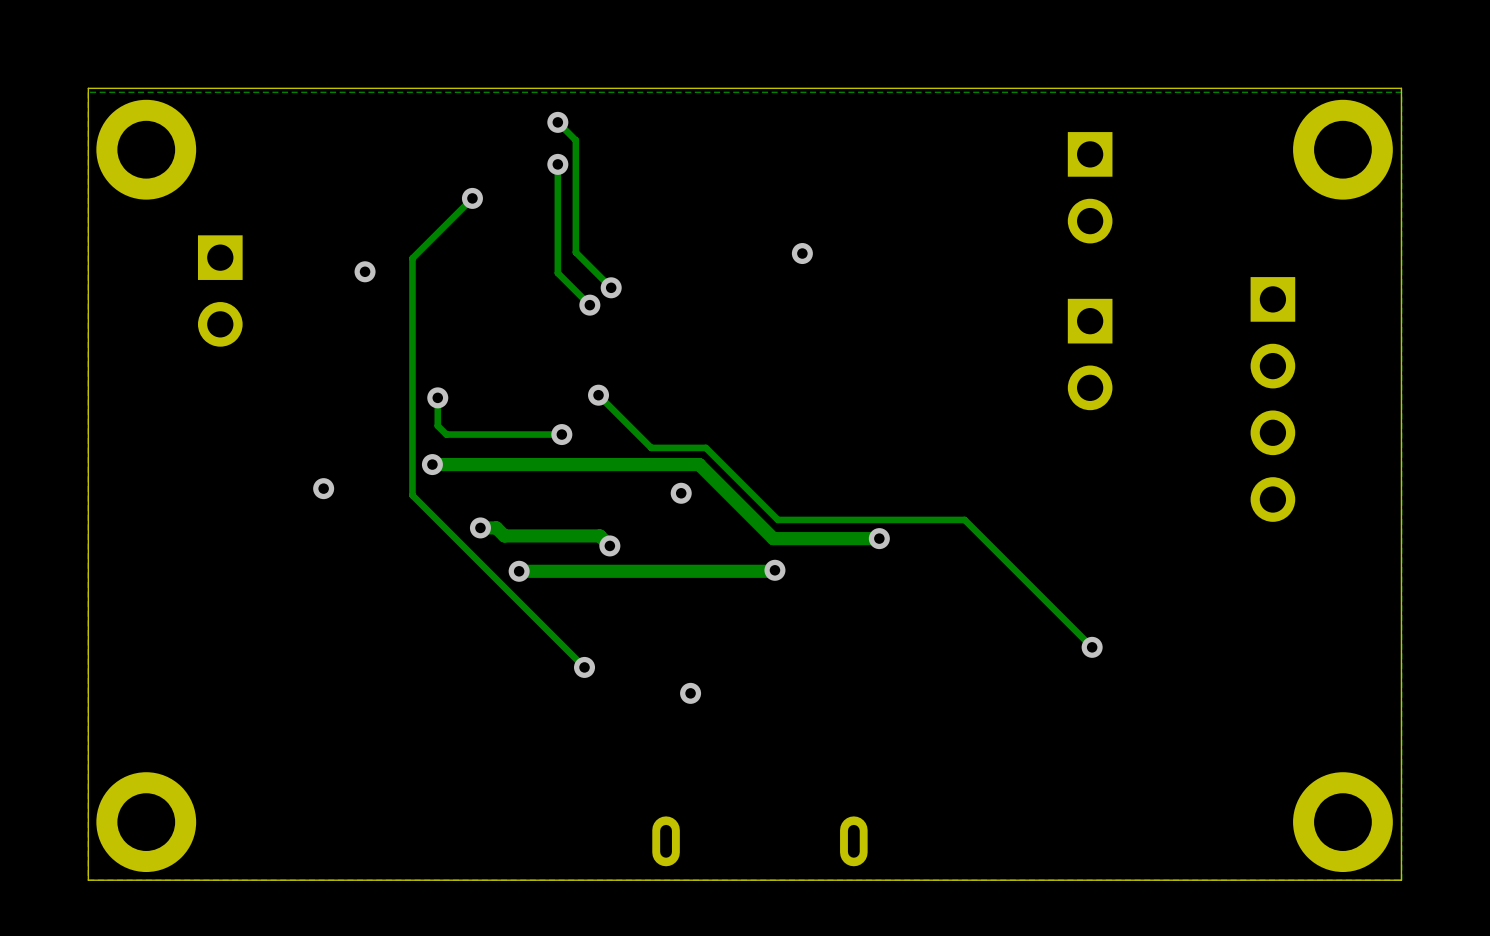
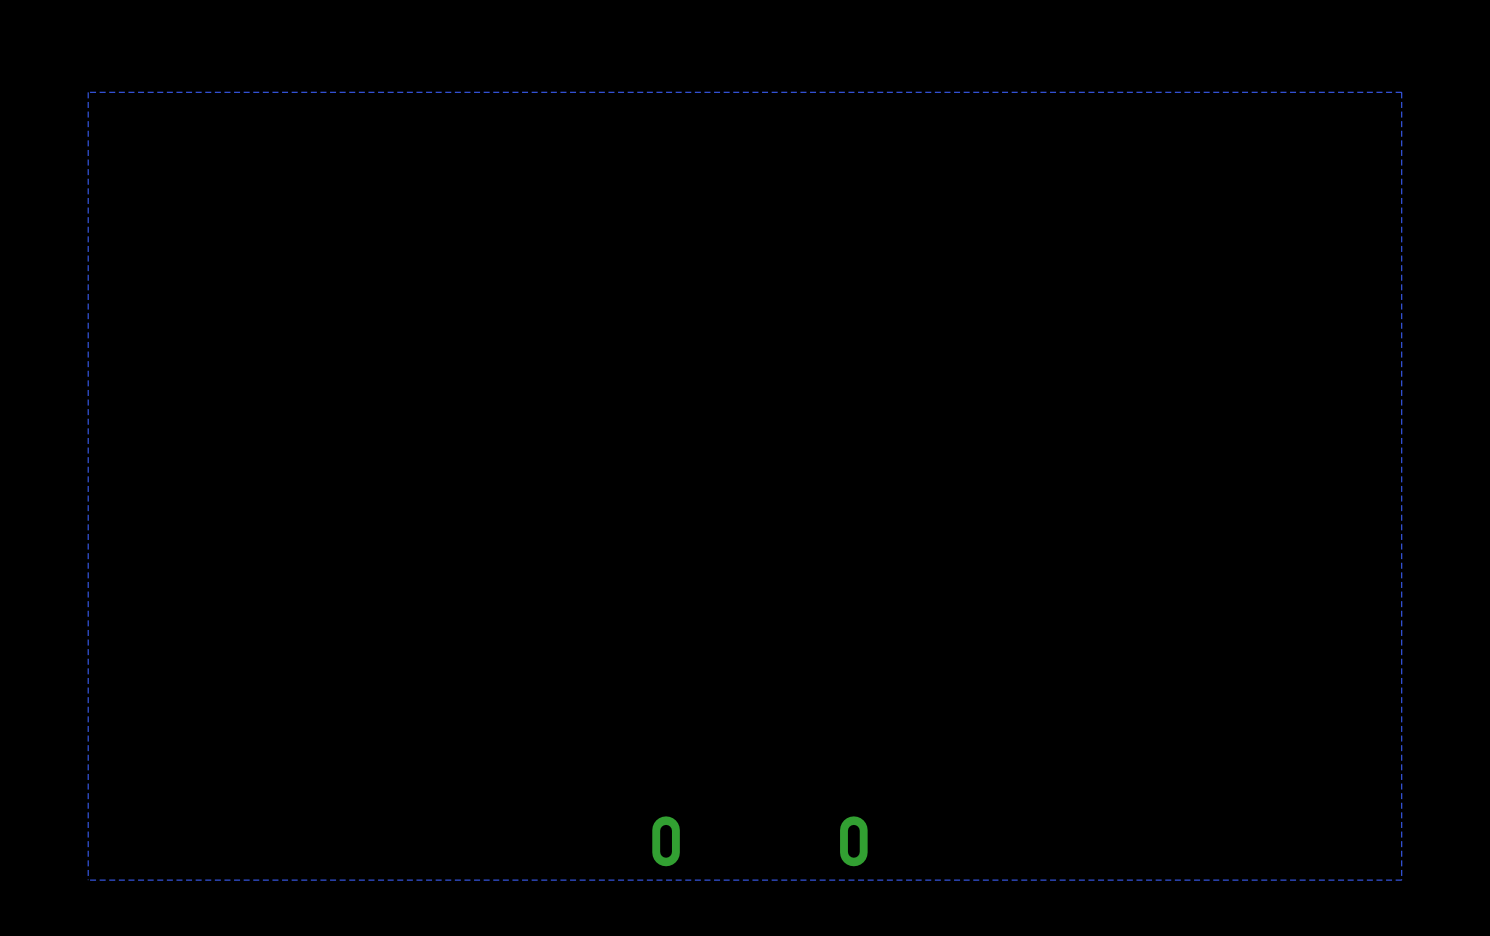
board edge: (1401, 88) (88, 88) (88, 880) (1401, 880) (1401, 88) -> none
track: (557, 122) (575, 140) (575, 252) (611, 287) -> none
via: (557, 122) -> none
part: (146, 149) -> none
part: (1342, 149) -> none
track: (557, 164) (557, 273) (589, 305) -> none
via: (557, 164) -> none
part: (1090, 187) -> none
track: (472, 198) (412, 258) (412, 495) (584, 667) -> none
via: (472, 198) -> none
via: (802, 253) -> none
via: (365, 271) -> none
via: (611, 287) -> none
part: (220, 291) -> none
via: (589, 305) -> none
part: (1090, 354) -> none
track: (598, 395) (651, 447) (705, 447) (777, 519) (964, 519) (1092, 647) -> none
via: (598, 395) -> none
track: (437, 397) (437, 425) (446, 434) (561, 434) -> none
via: (437, 397) -> none
part: (1272, 399) -> none
via: (561, 434) -> none
track: (430, 464) (699, 464) (773, 538) (879, 538) -> none
via: (432, 464) -> none
via: (323, 488) -> none
via: (681, 493) -> none
track: (480, 527) (496, 527) (504, 535) (599, 535) (609, 545) -> none
via: (480, 527) -> none
via: (879, 538) -> none
via: (609, 545) -> none
via: (774, 570) -> none
via: (519, 571) -> none
track: (773, 571) (519, 571) -> none
via: (1092, 647) -> none
via: (584, 667) -> none
via: (690, 693) -> none
part: (146, 822) -> none
part: (1342, 822) -> none

